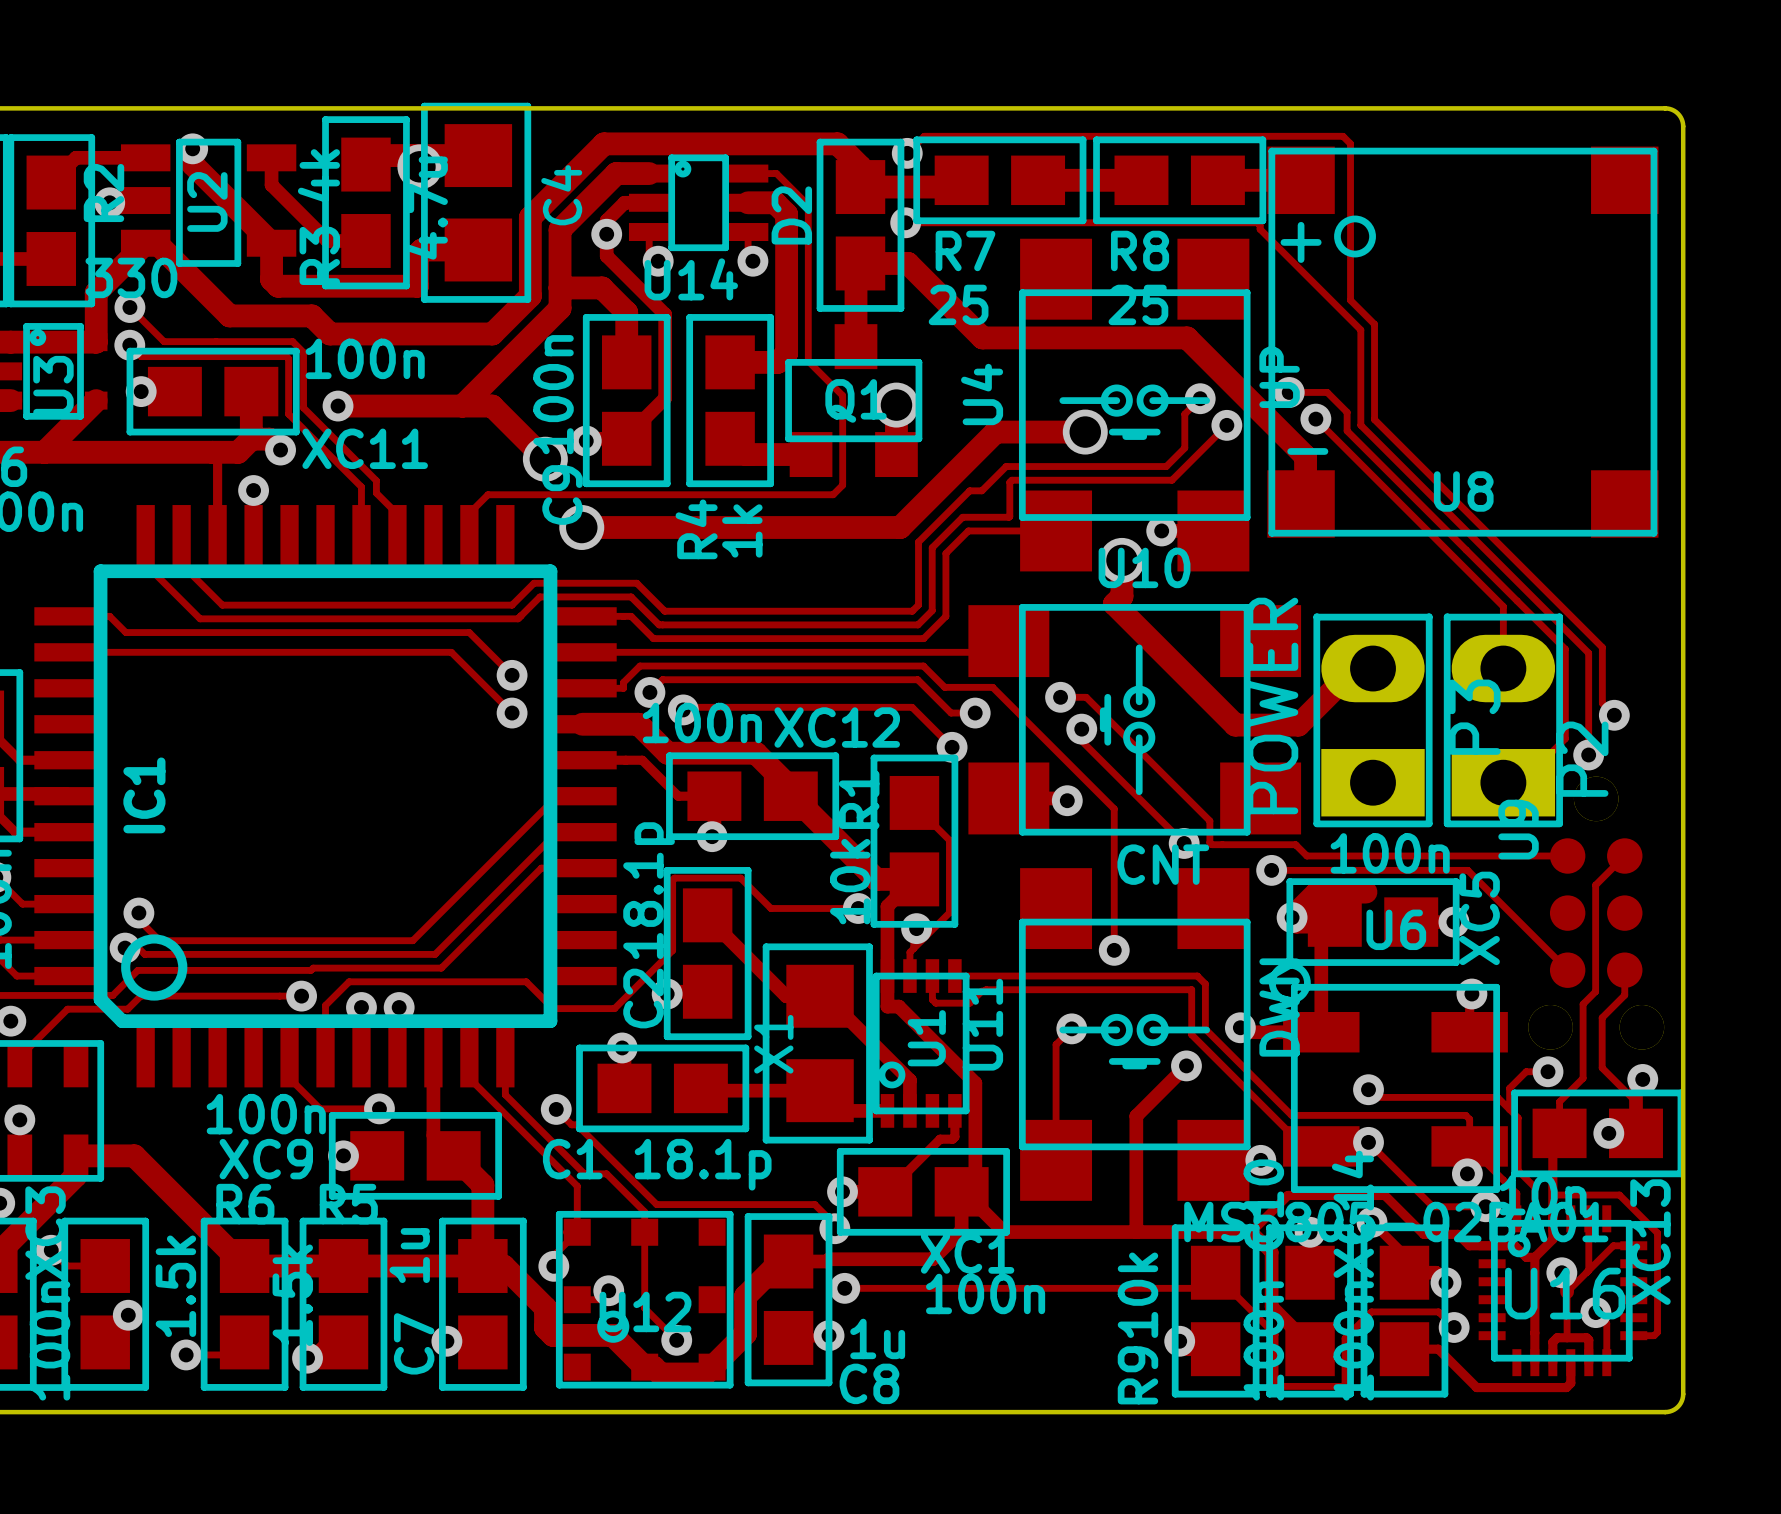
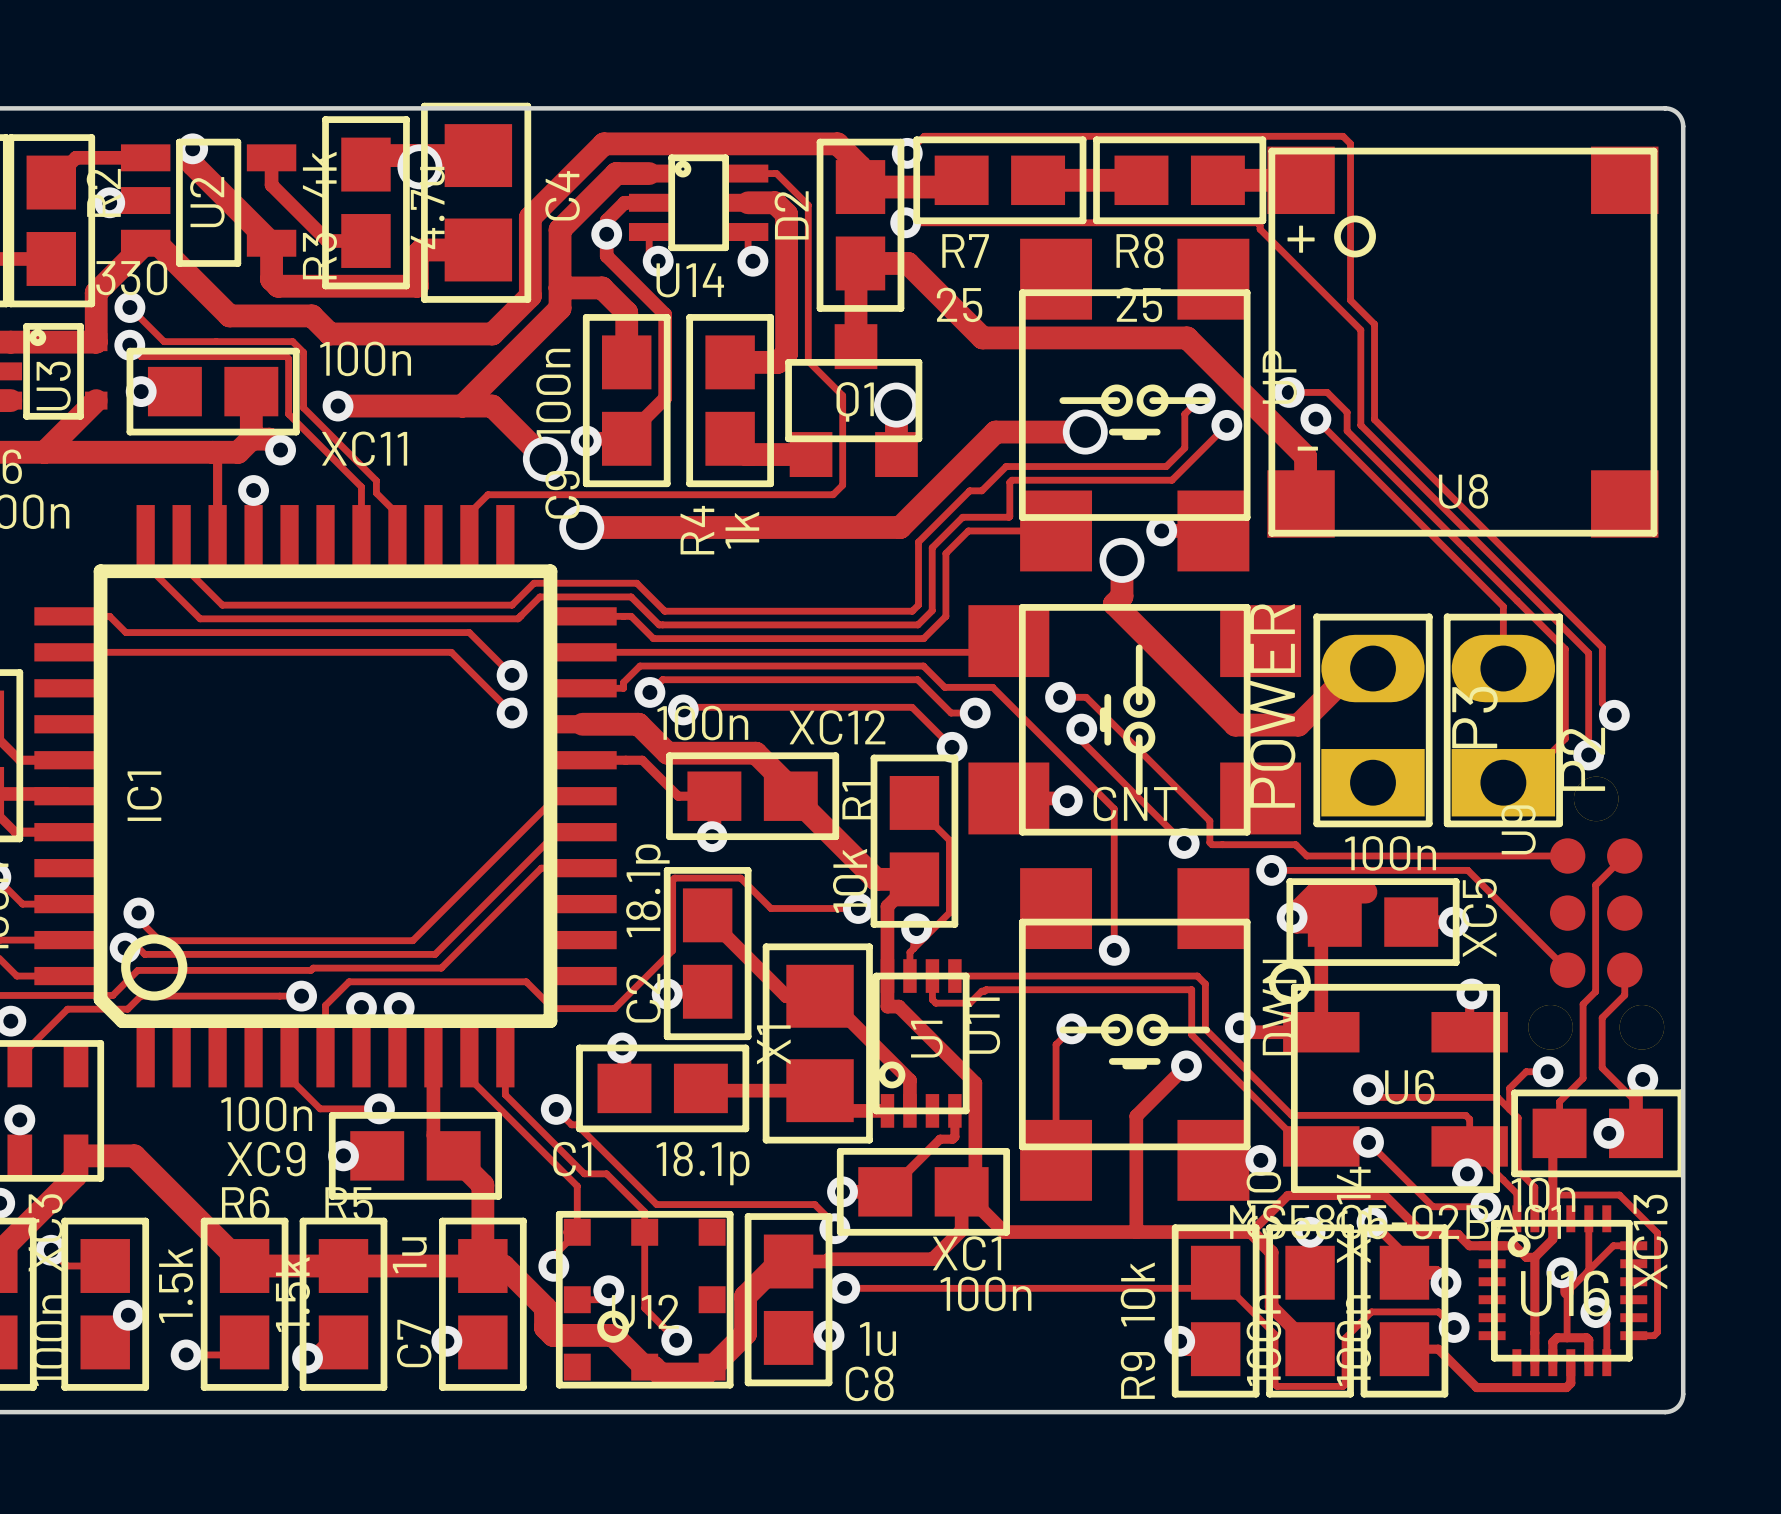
U4 name: U4 (982, 394) -> none
U10 name: U10 (1144, 567) -> none
U10 value position: CNT (1163, 864) -> CNT (1135, 803)
U6 name position: U6 (1396, 929) -> U6 (1409, 1087)

